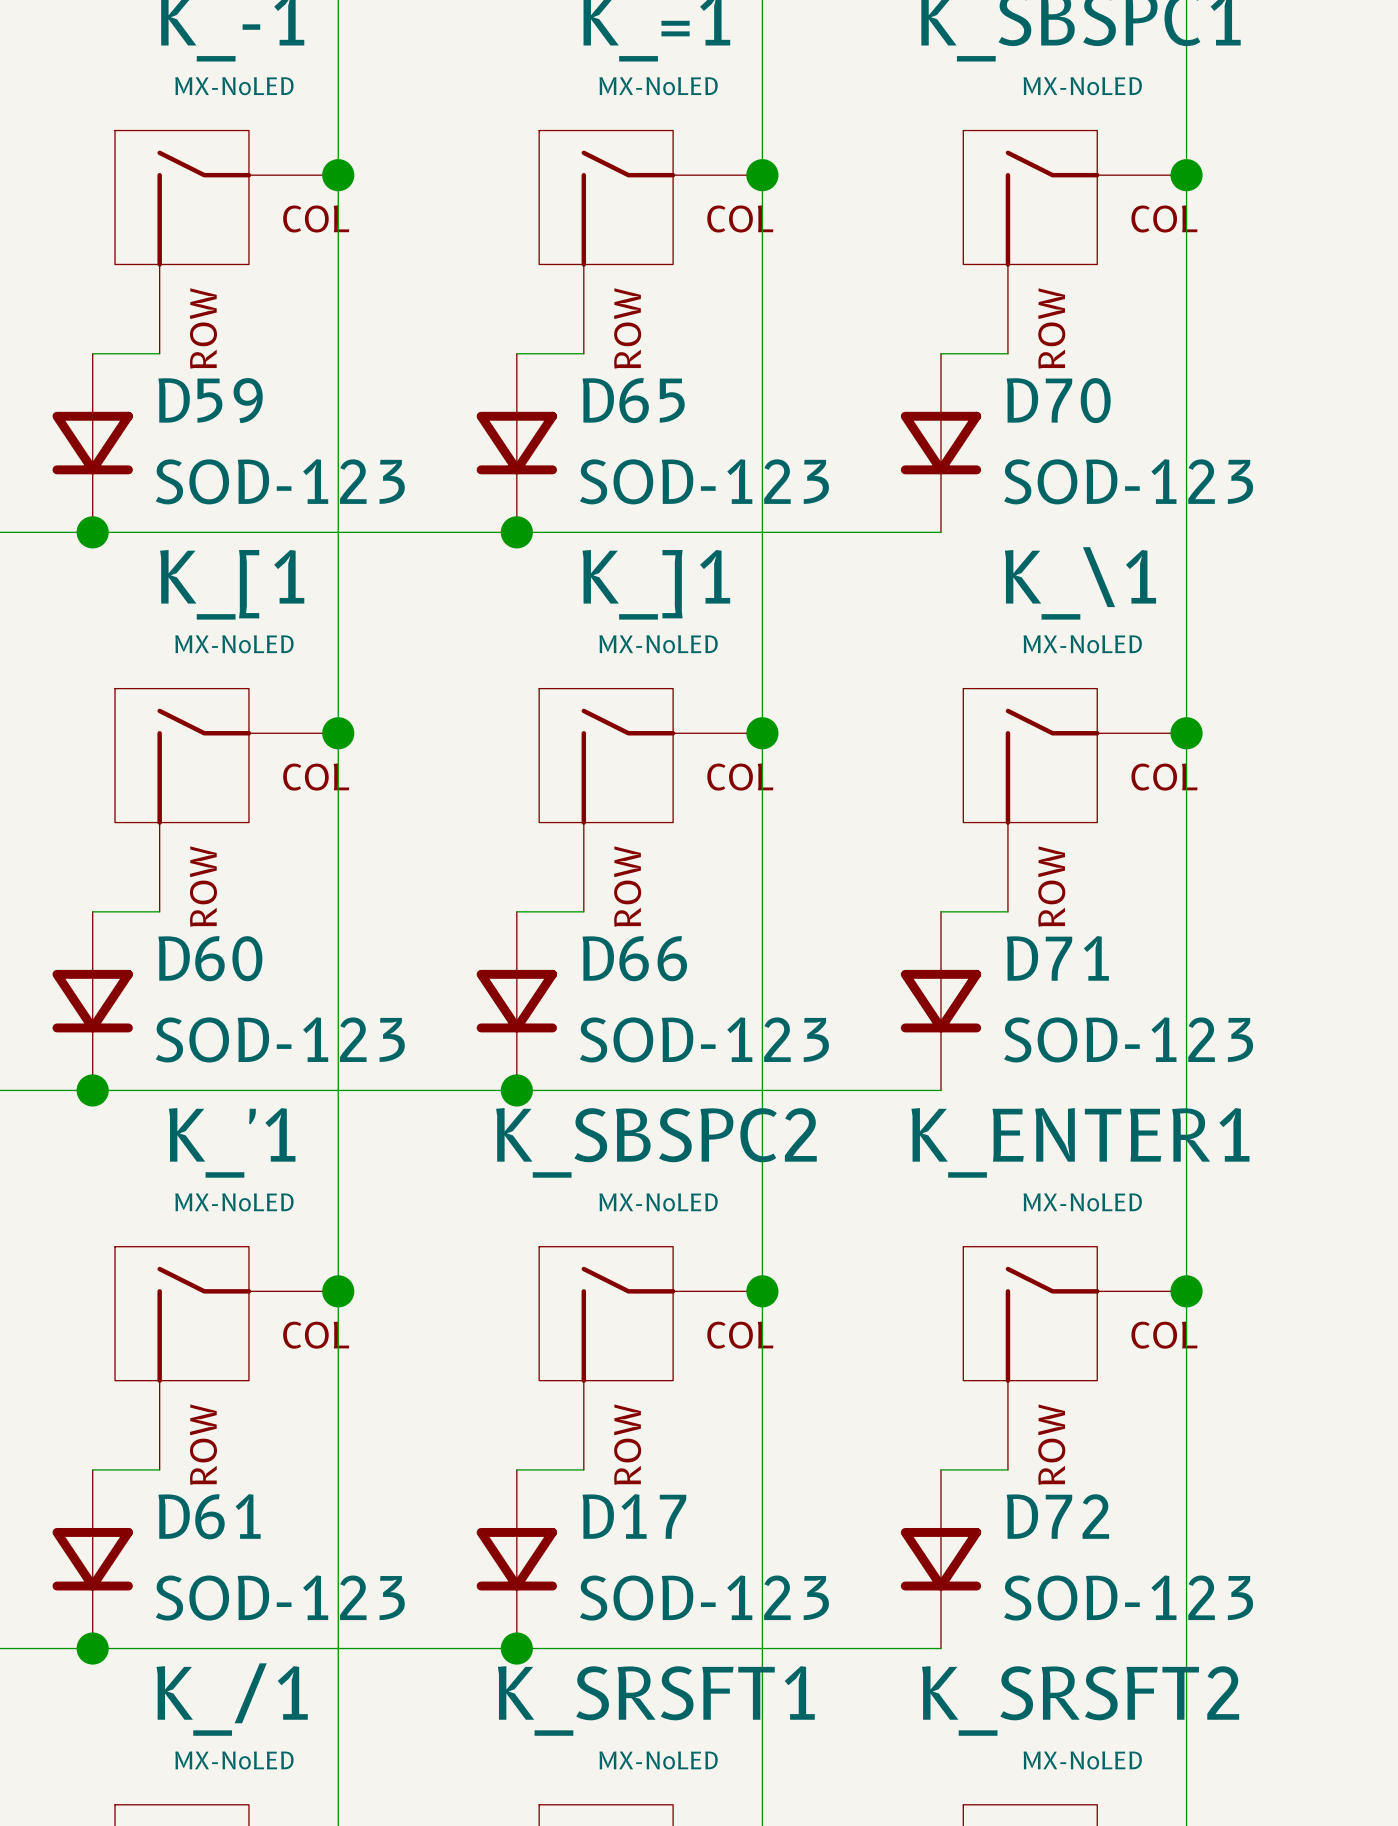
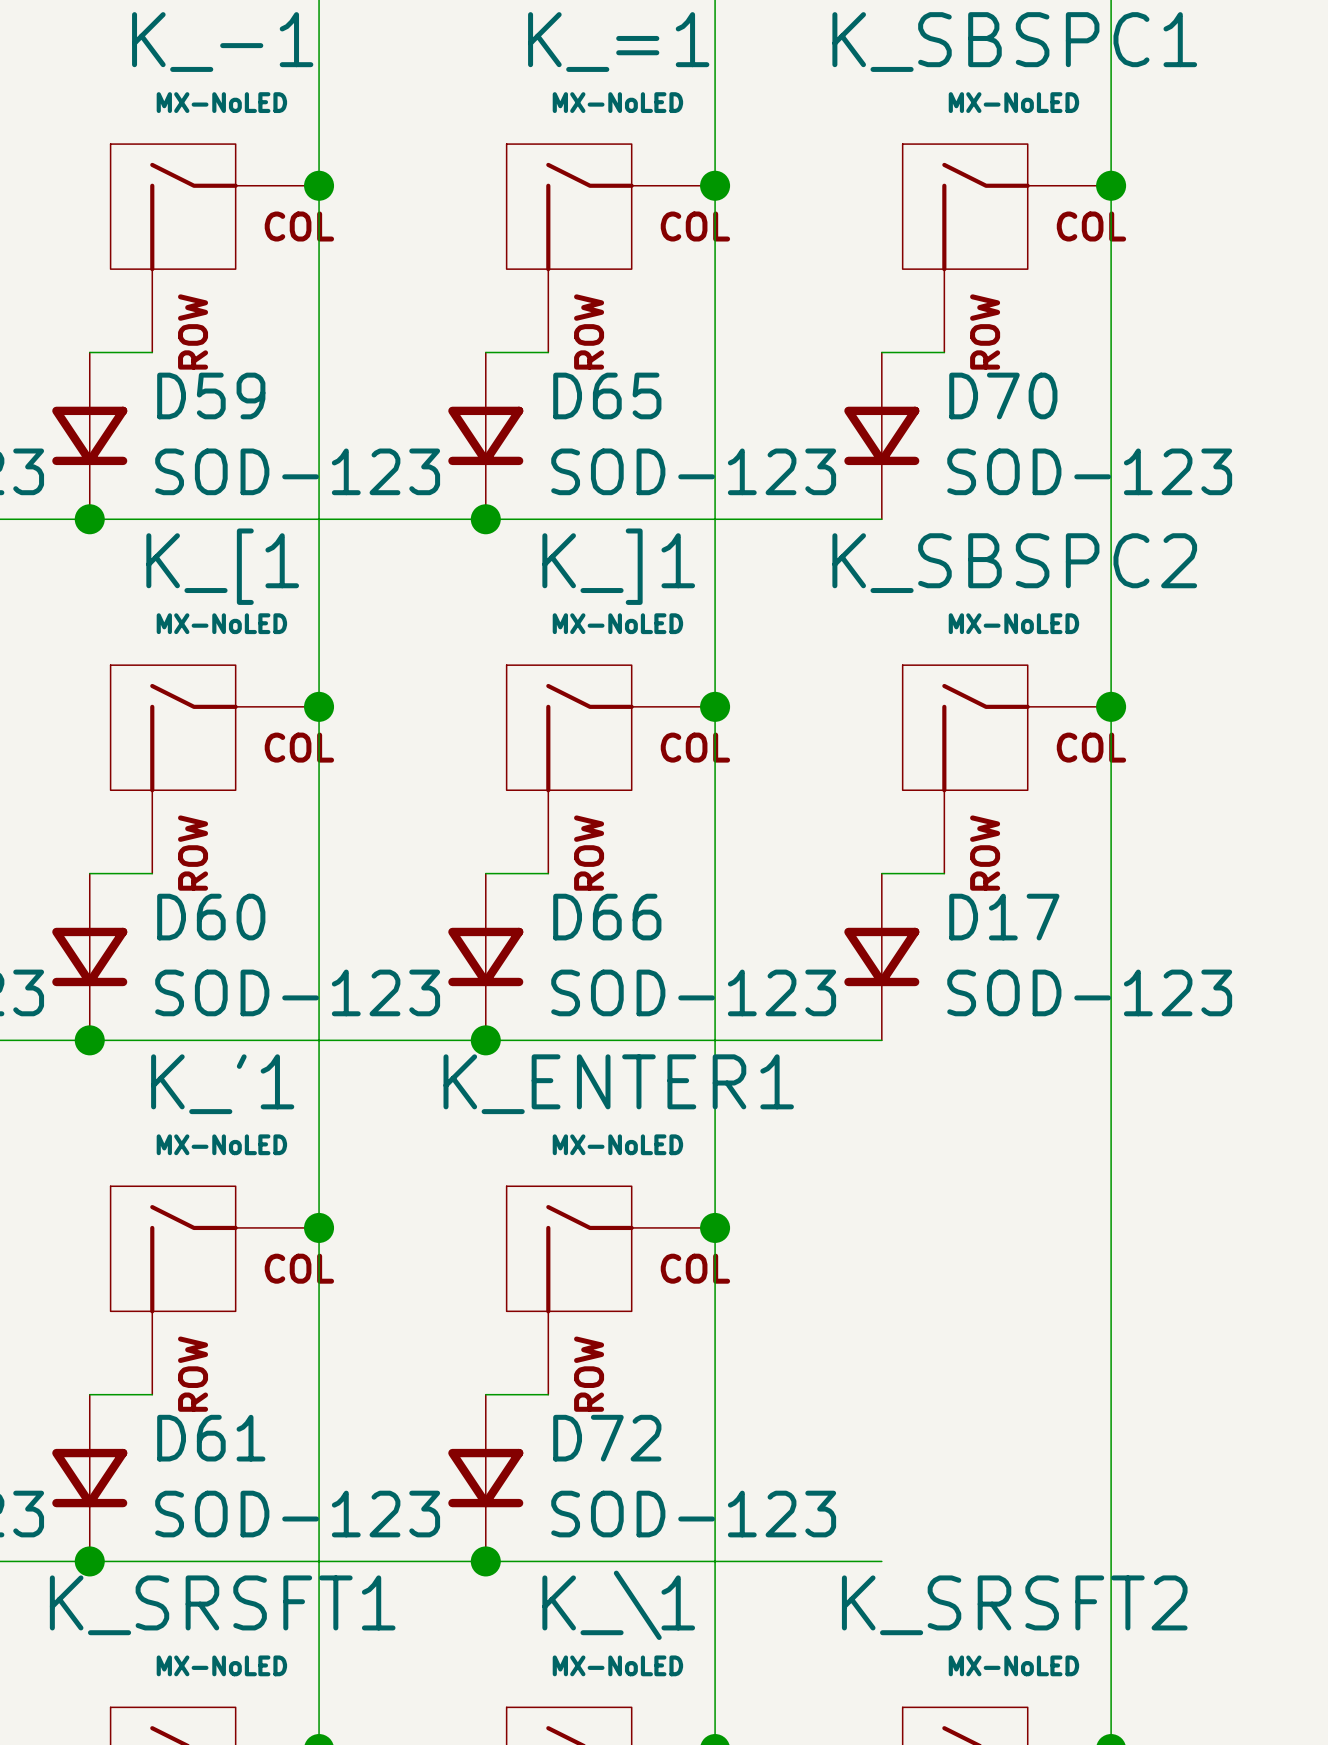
K_\1 name: K_\1 (1080, 583) -> K_SBSPC2 (1014, 563)
D71 name: D71 (1057, 958) -> D17 (1004, 917)
K_SBSPC2 name: K_SBSPC2 (656, 1142) -> K_ENTER1 (618, 1084)
junction: (1186, 1291) -> none
K_ENTER1: MX-NoLED (1074, 1358) -> none
wire: (940, 1469) (1007, 1469) -> none
D17 name: D17 (634, 1516) -> D72 (607, 1438)
D72: SOD-123 (940, 1559) -> none
K_/1 name: K_/1 (232, 1699) -> K_SRSFT1 (222, 1605)
K_SRSFT1 name: K_SRSFT1 (656, 1700) -> K_\1 (618, 1605)

